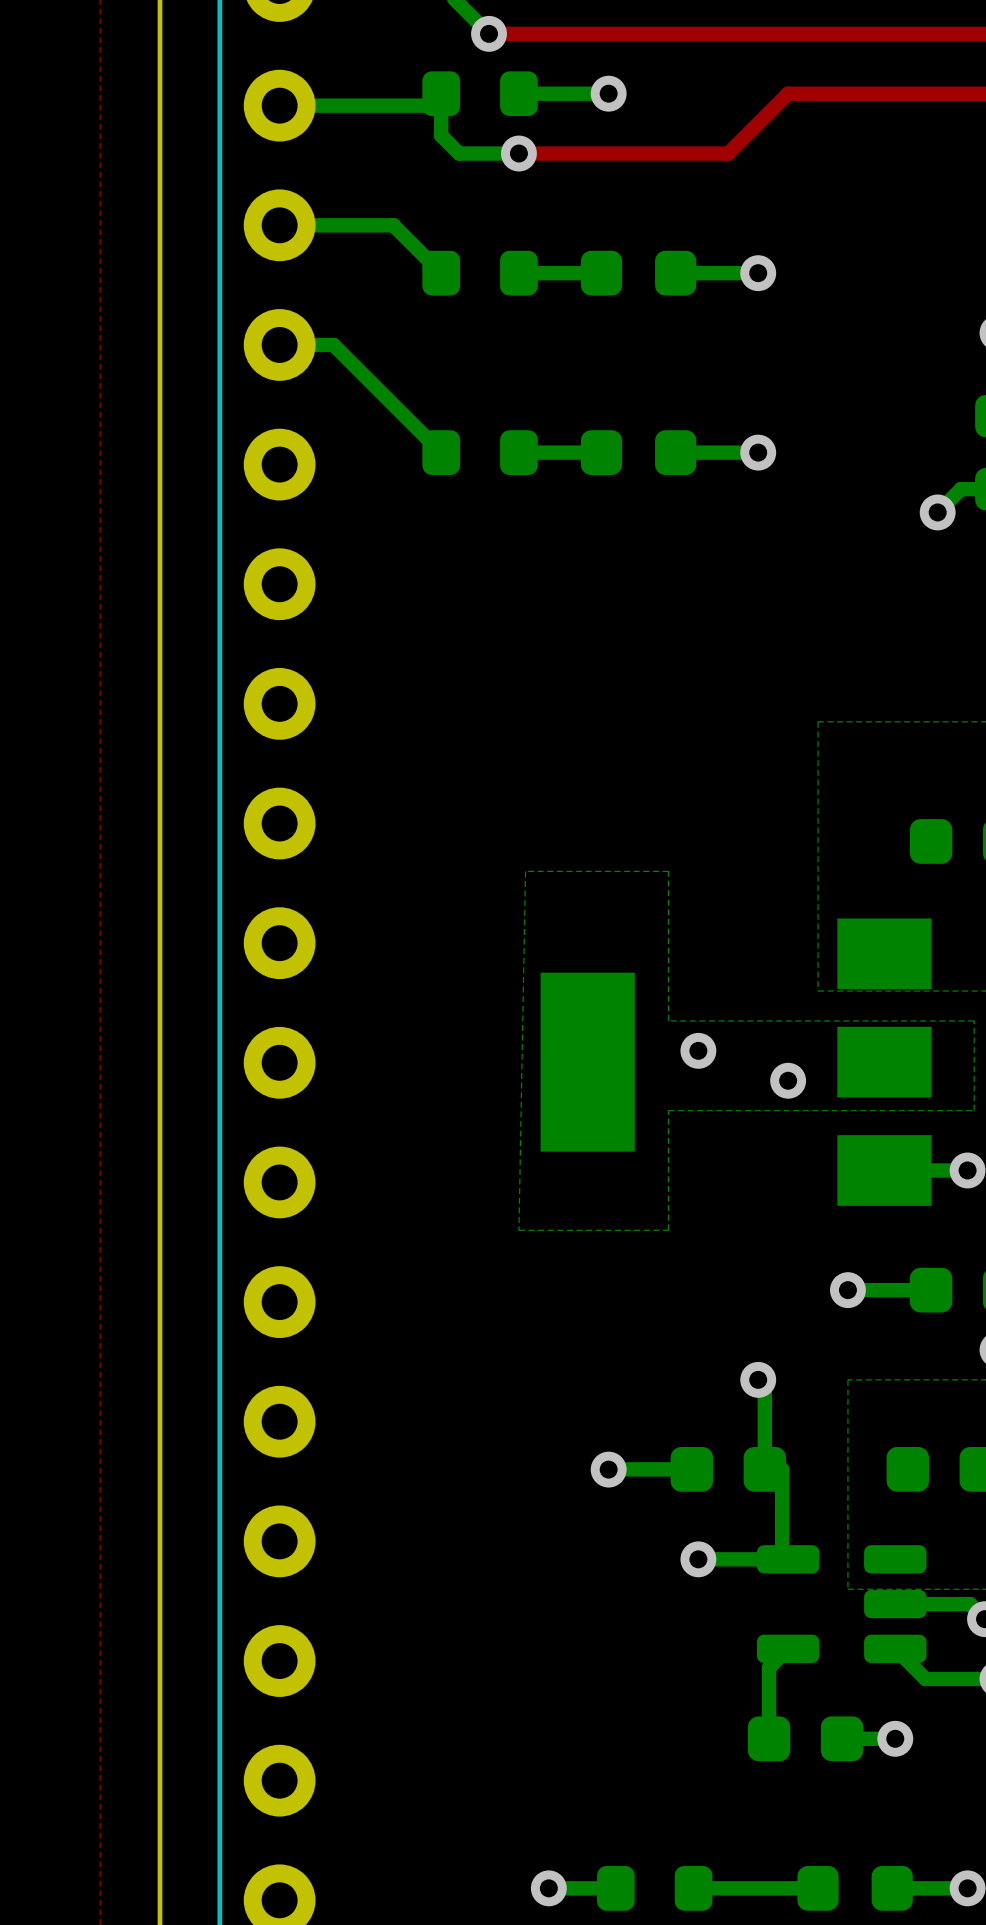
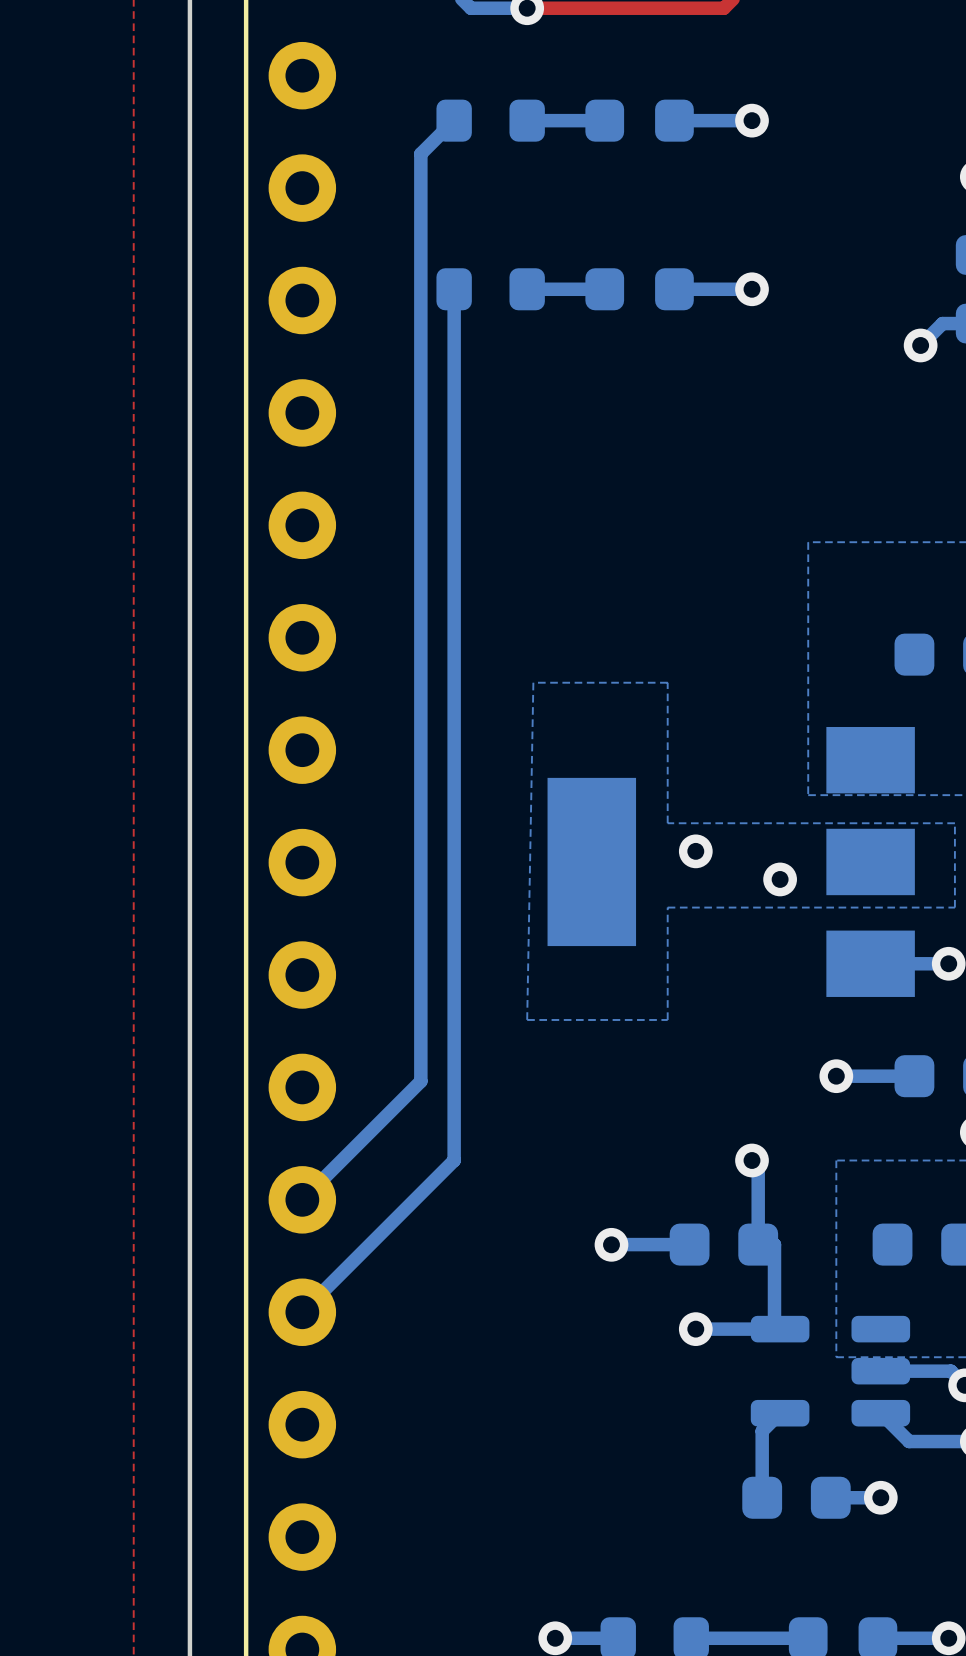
bottom track: (279, 225) (393, 225) (441, 273) -> (302, 1199) (420, 1081) (420, 153) (454, 120)
bottom track: (279, 344) (333, 344) (441, 452) -> (302, 1312) (454, 1160) (454, 289)

